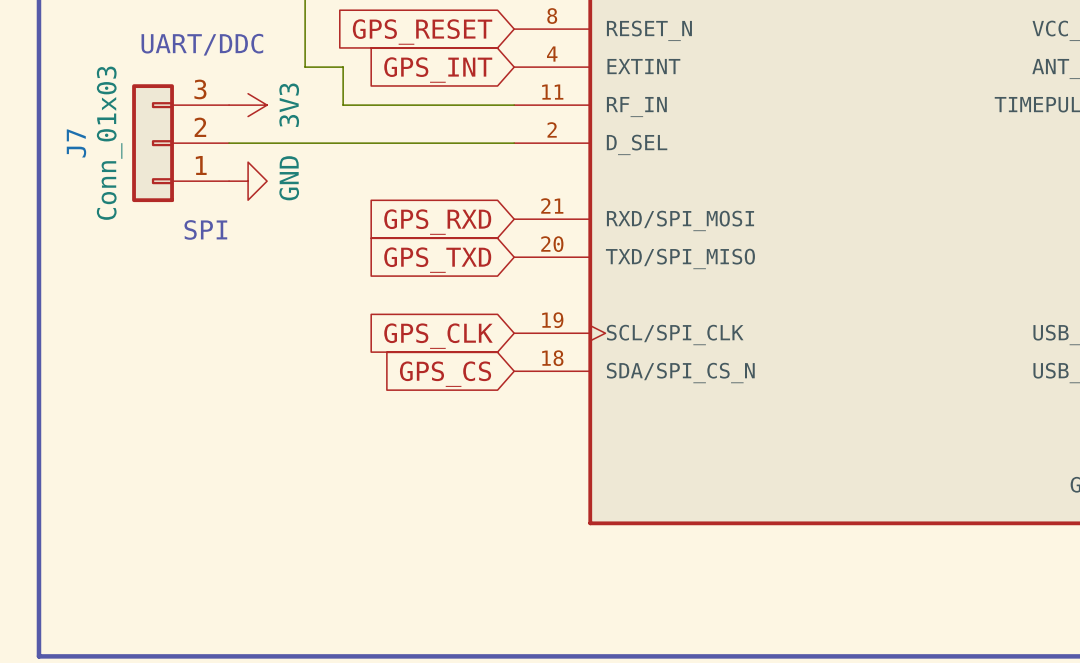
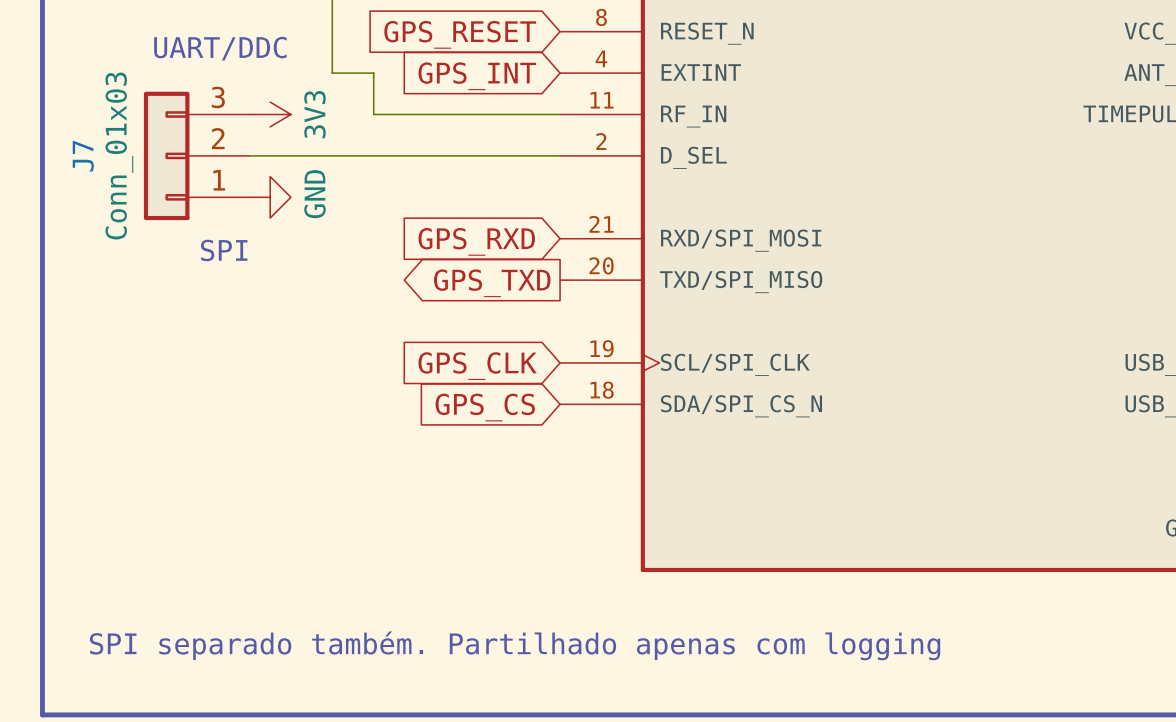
global label shape: input (437, 260) -> output (492, 283)
text: none -> SPI separado também. Partilhado apenas com logging (515, 645)

